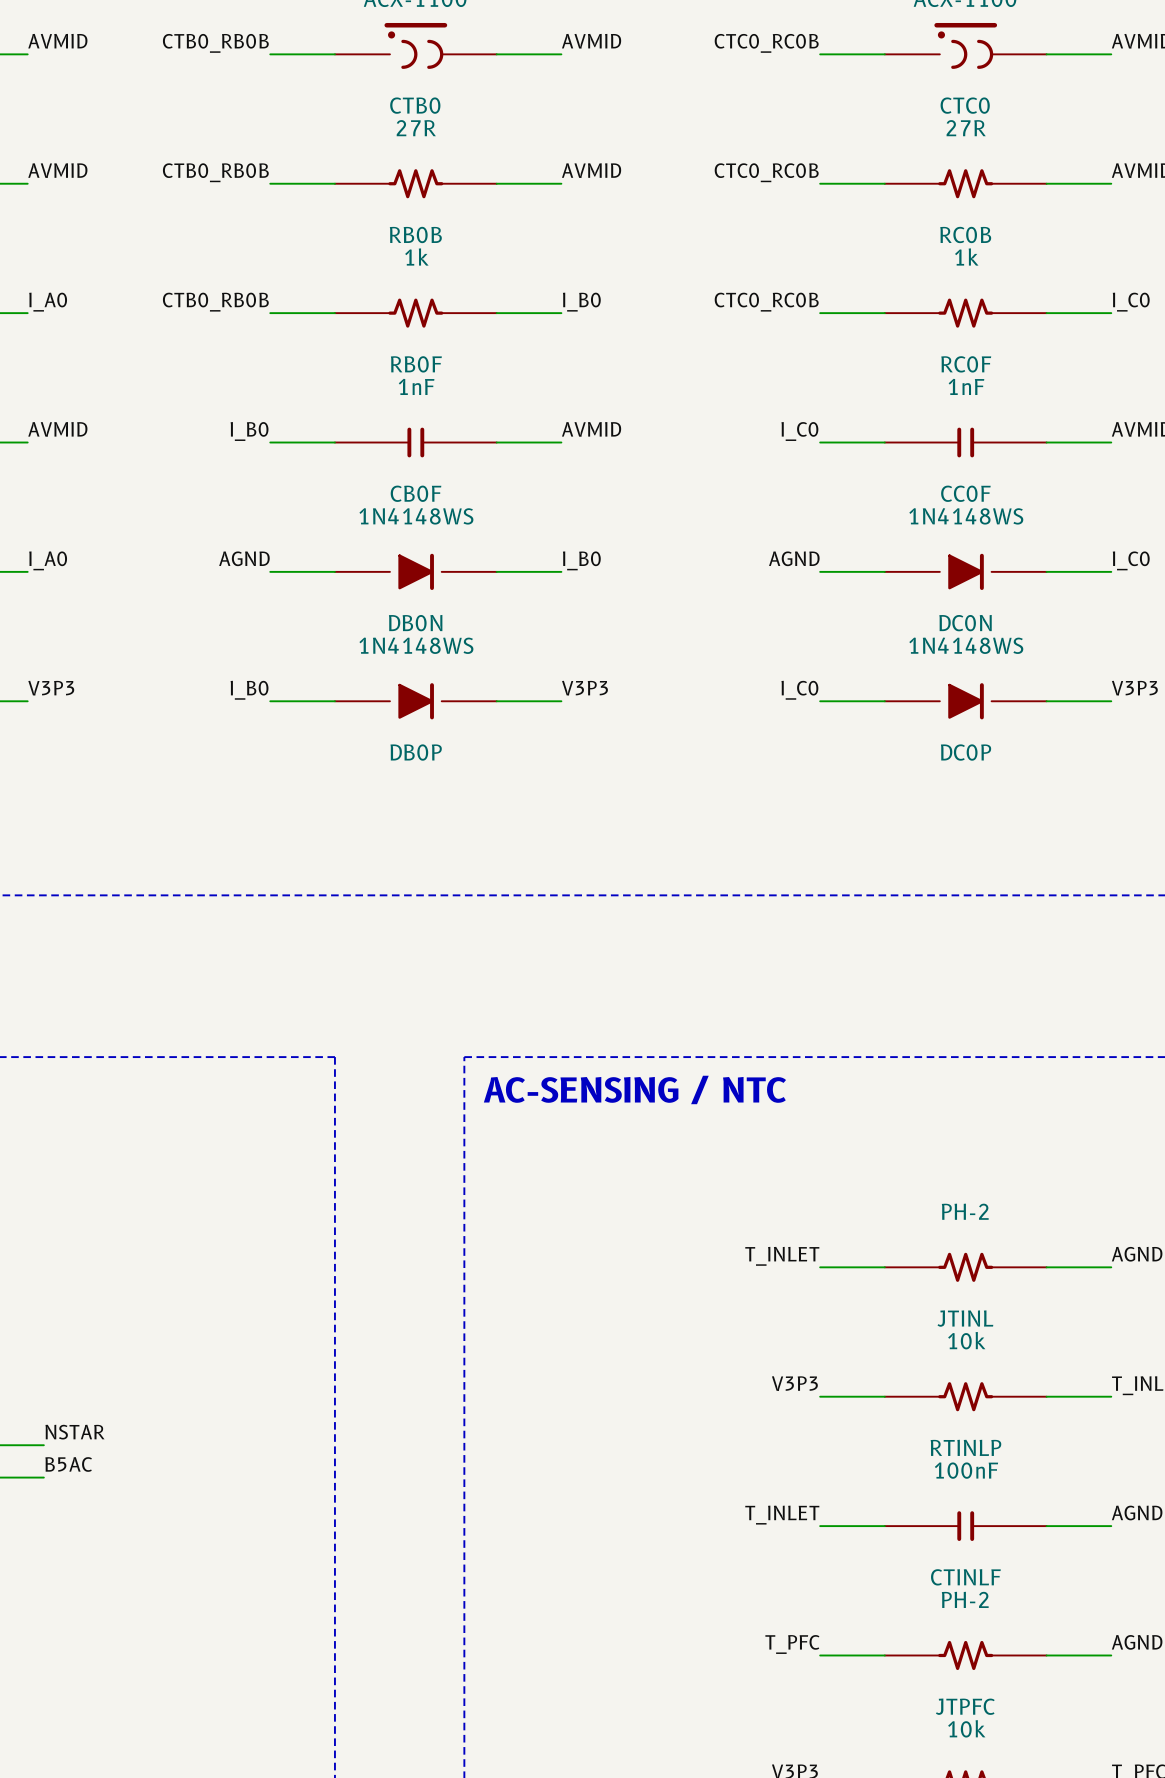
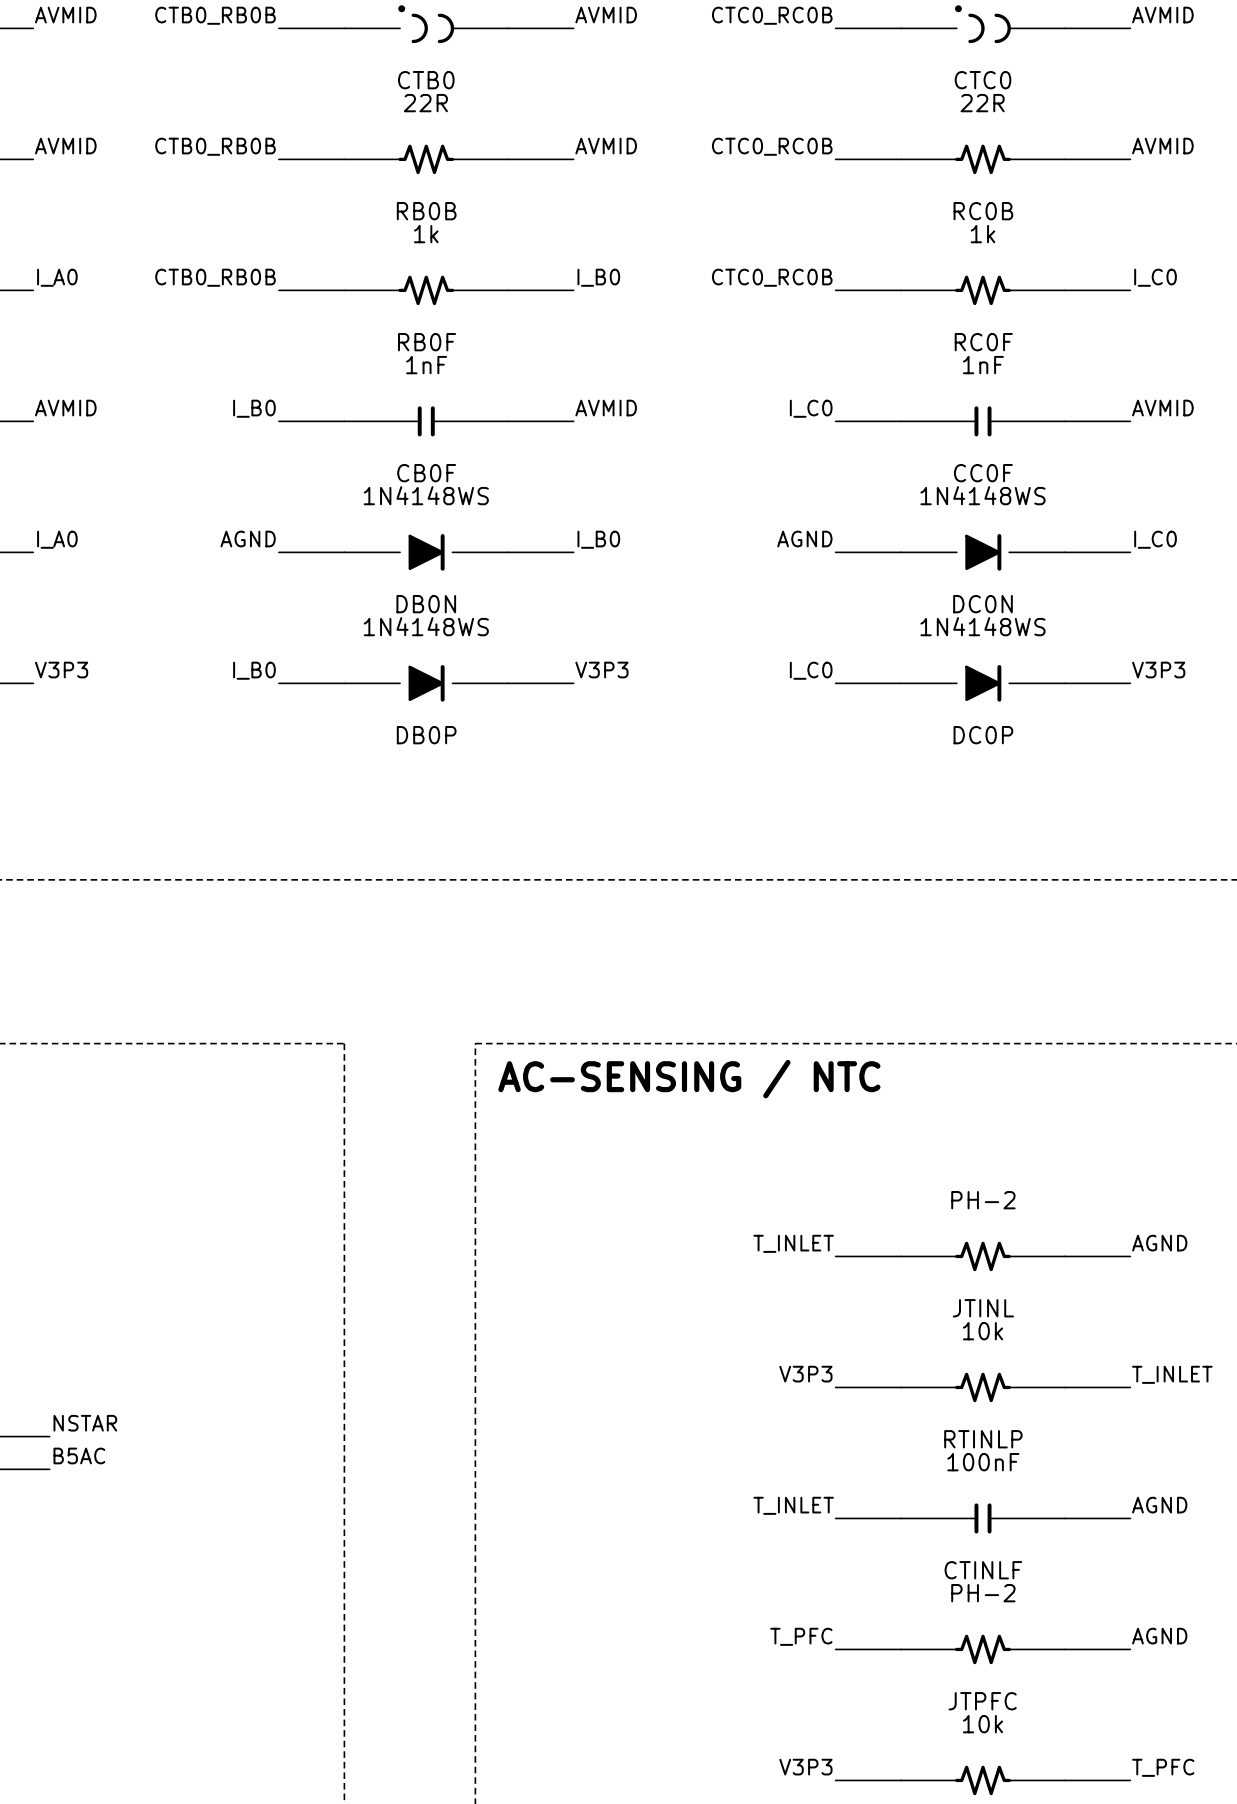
RB0B value: 27R (416, 128) -> 22R (425, 103)
RC0B value: 27R (966, 128) -> 22R (982, 103)

